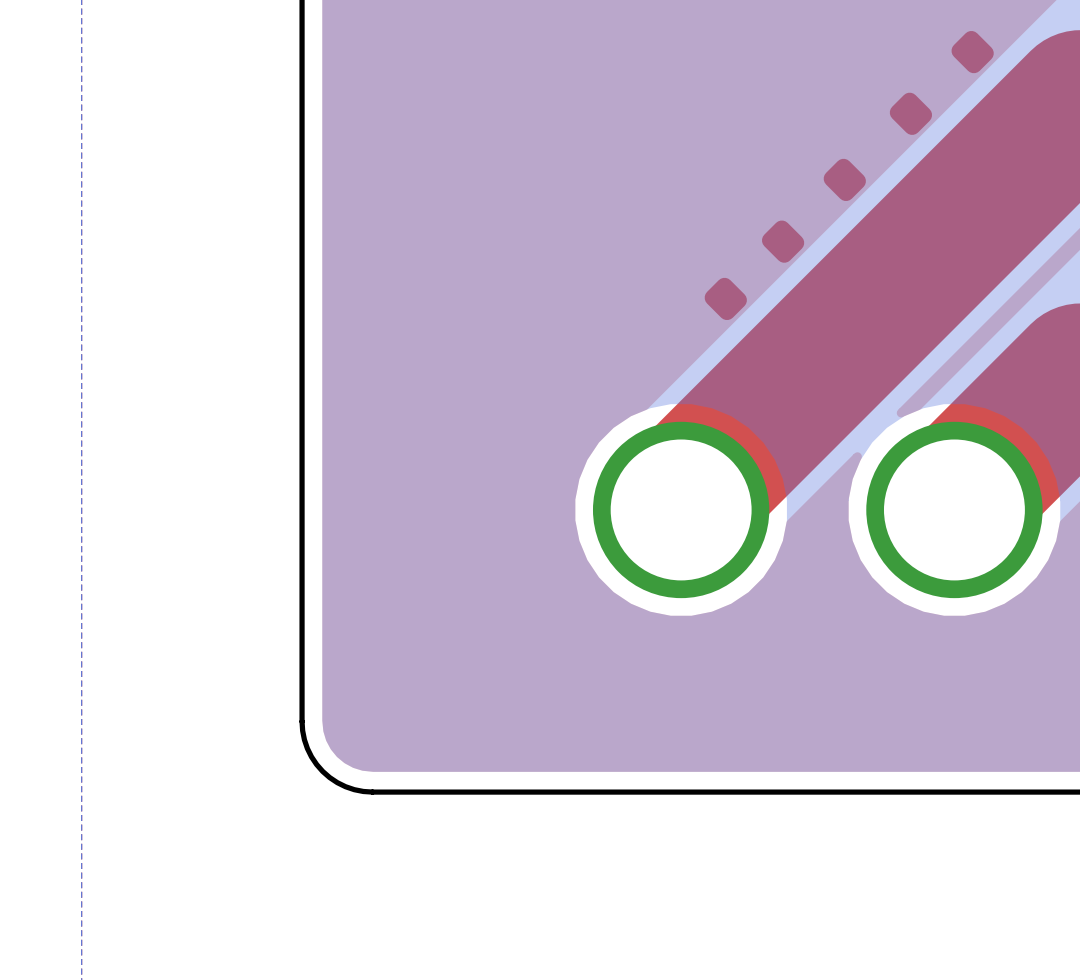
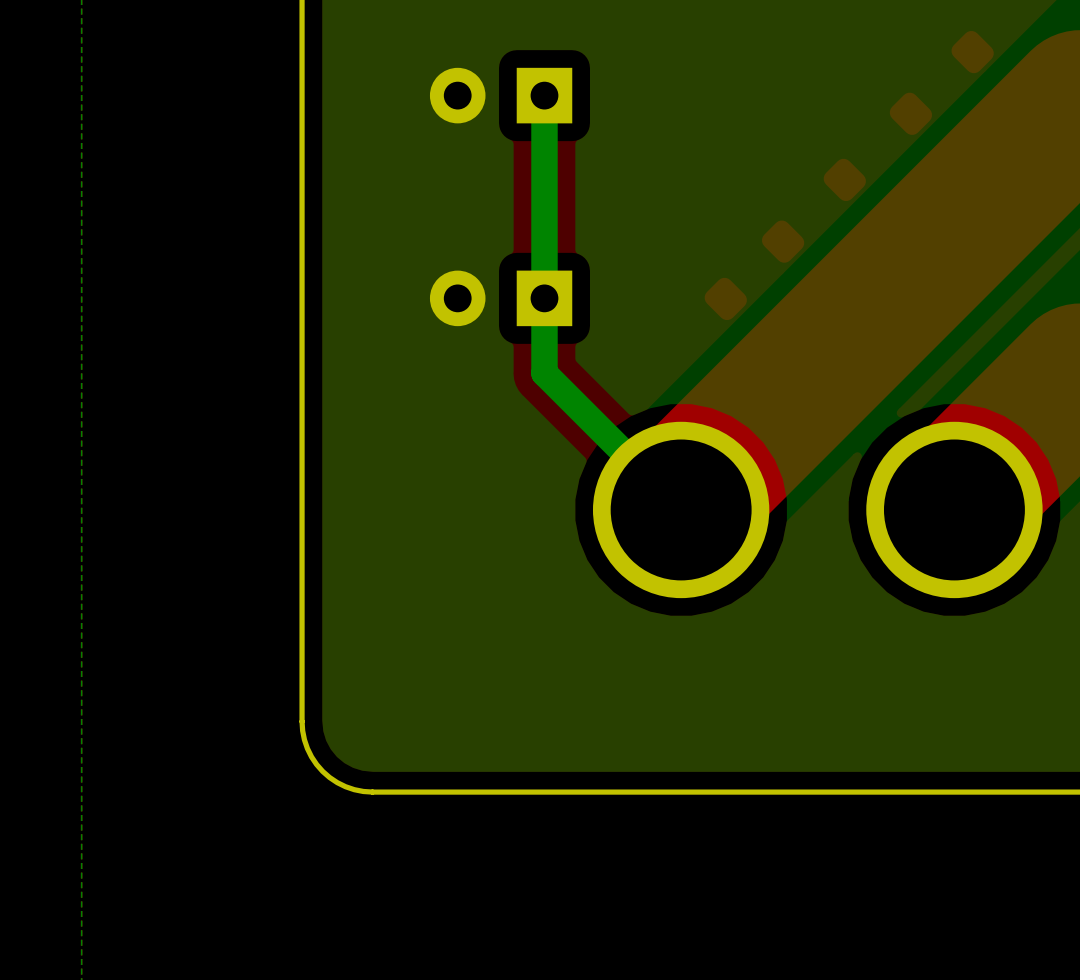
part: none -> (501, 95)
bottom track: none -> (544, 95) (544, 373) (681, 509)
part: none -> (501, 298)

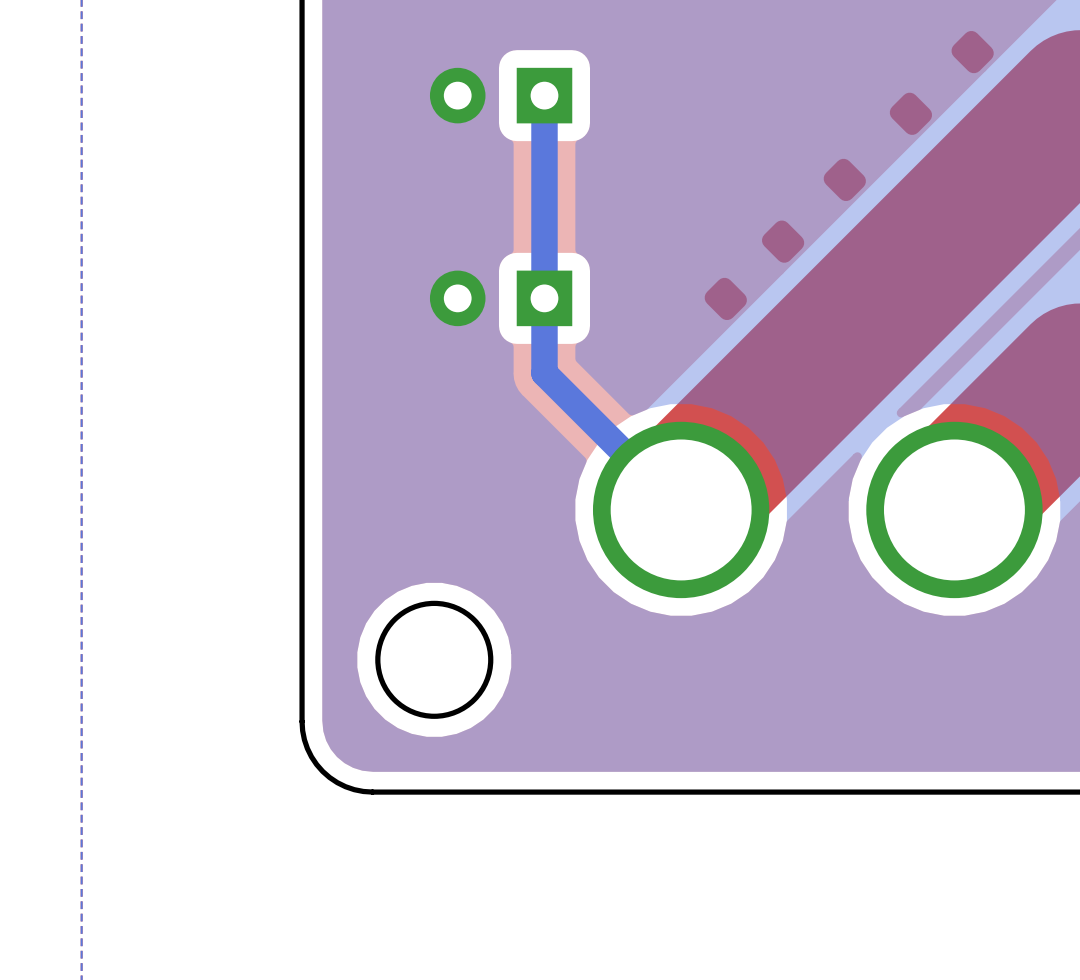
round board edge: none -> [375, 600, 494, 719]

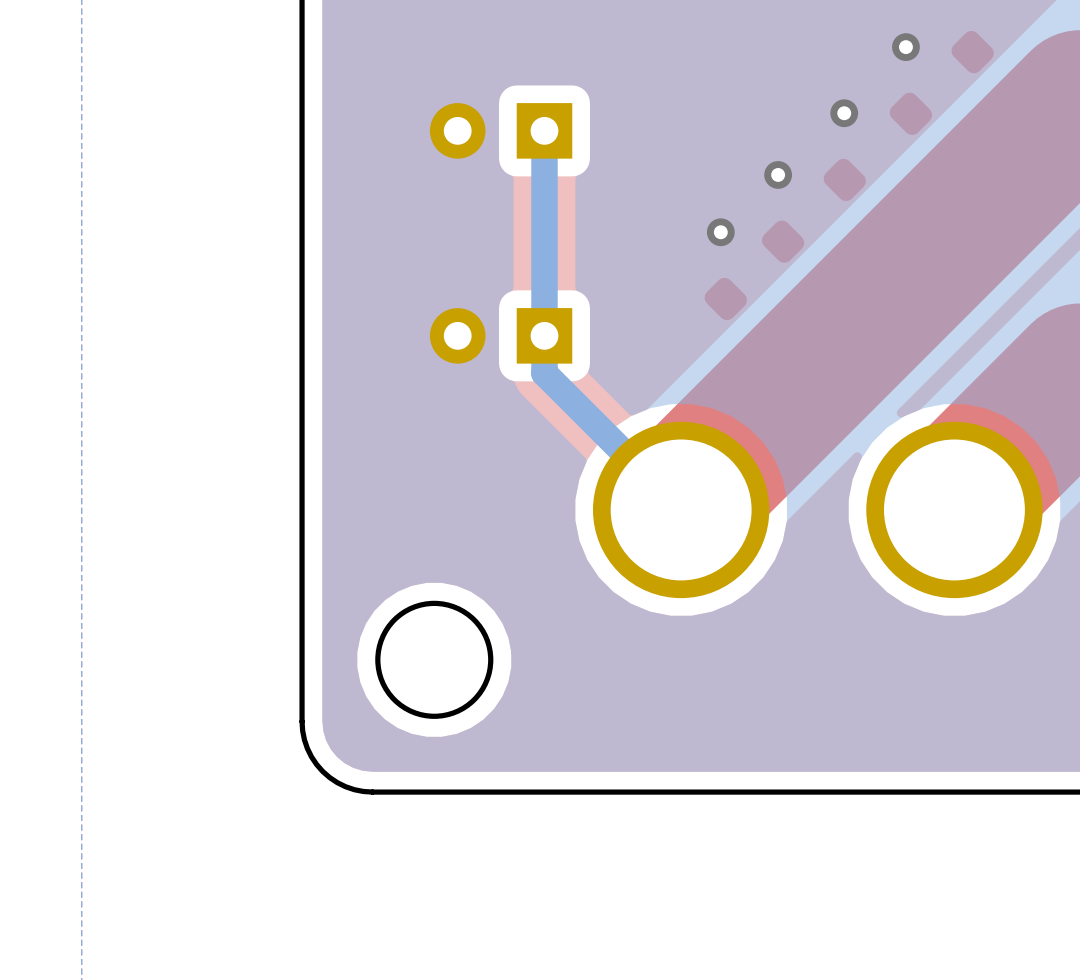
via: none -> (905, 47)
part position: (501, 95) -> (501, 130)
via: none -> (844, 113)
via: none -> (778, 174)
via: none -> (720, 232)
part position: (501, 298) -> (501, 335)

